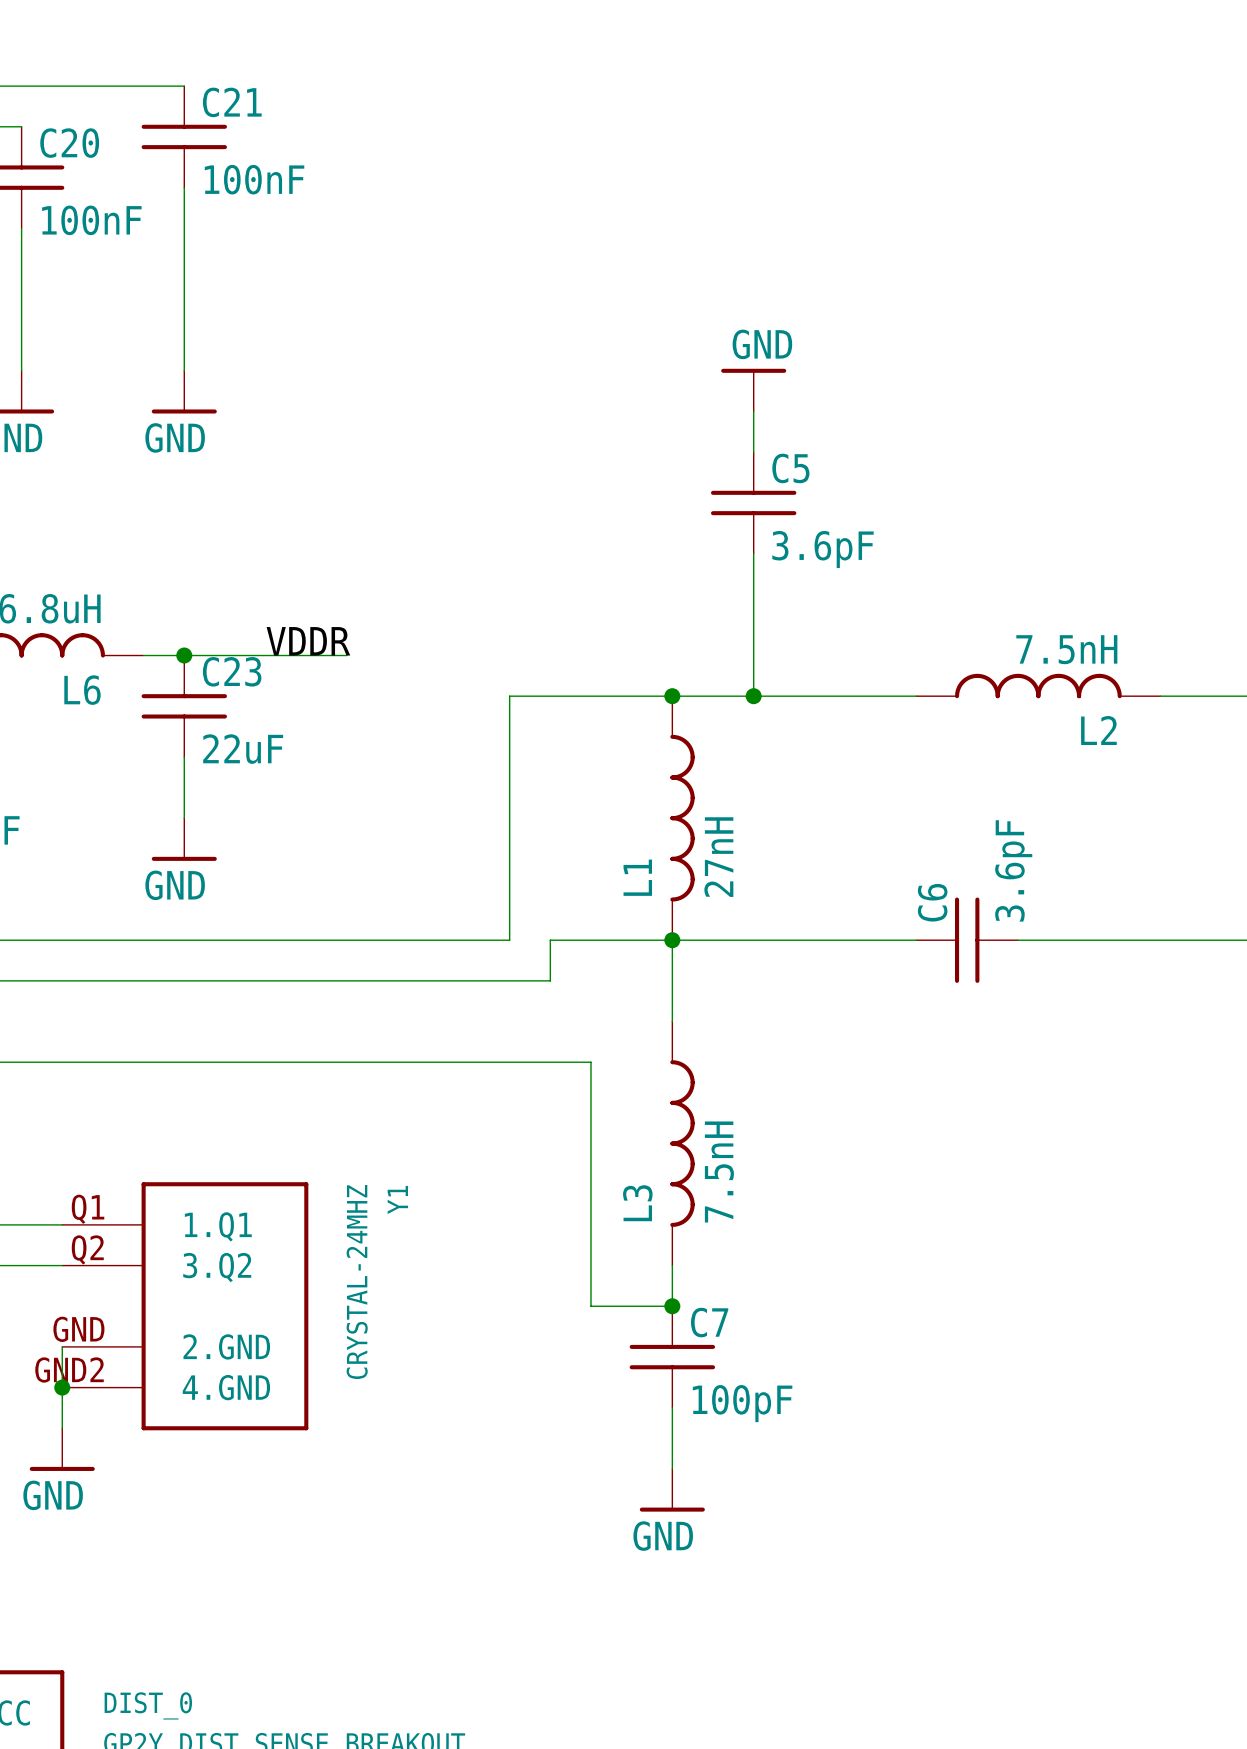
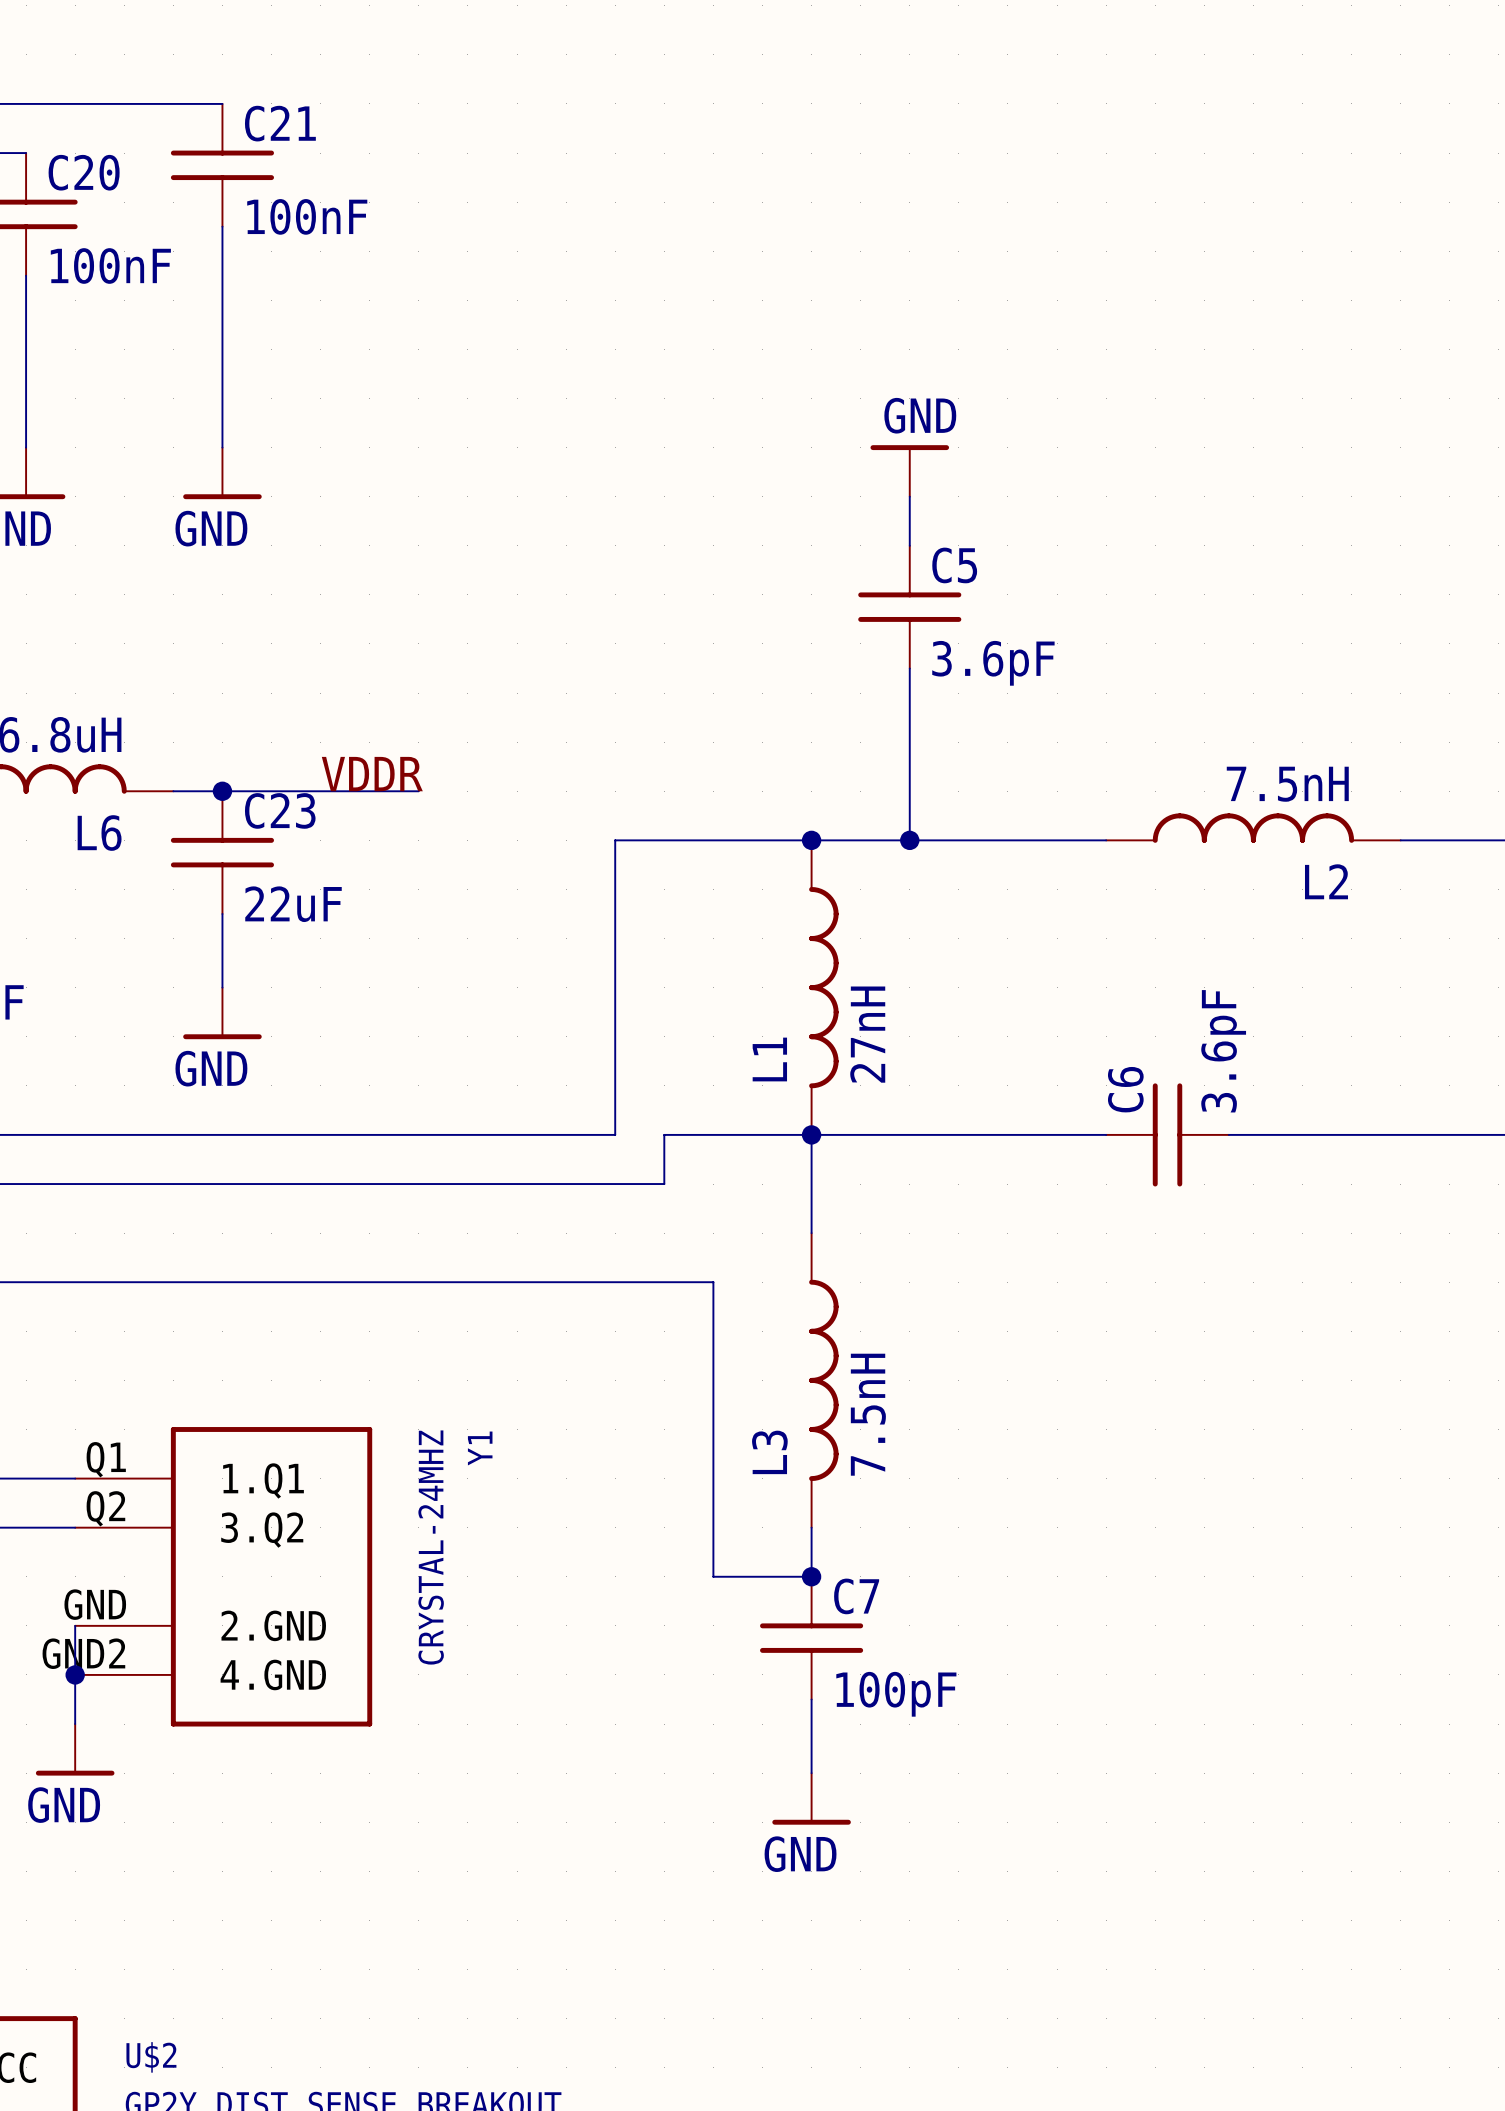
DIST_0 name: DIST_0 (148, 1705) -> U$2 (151, 2057)

